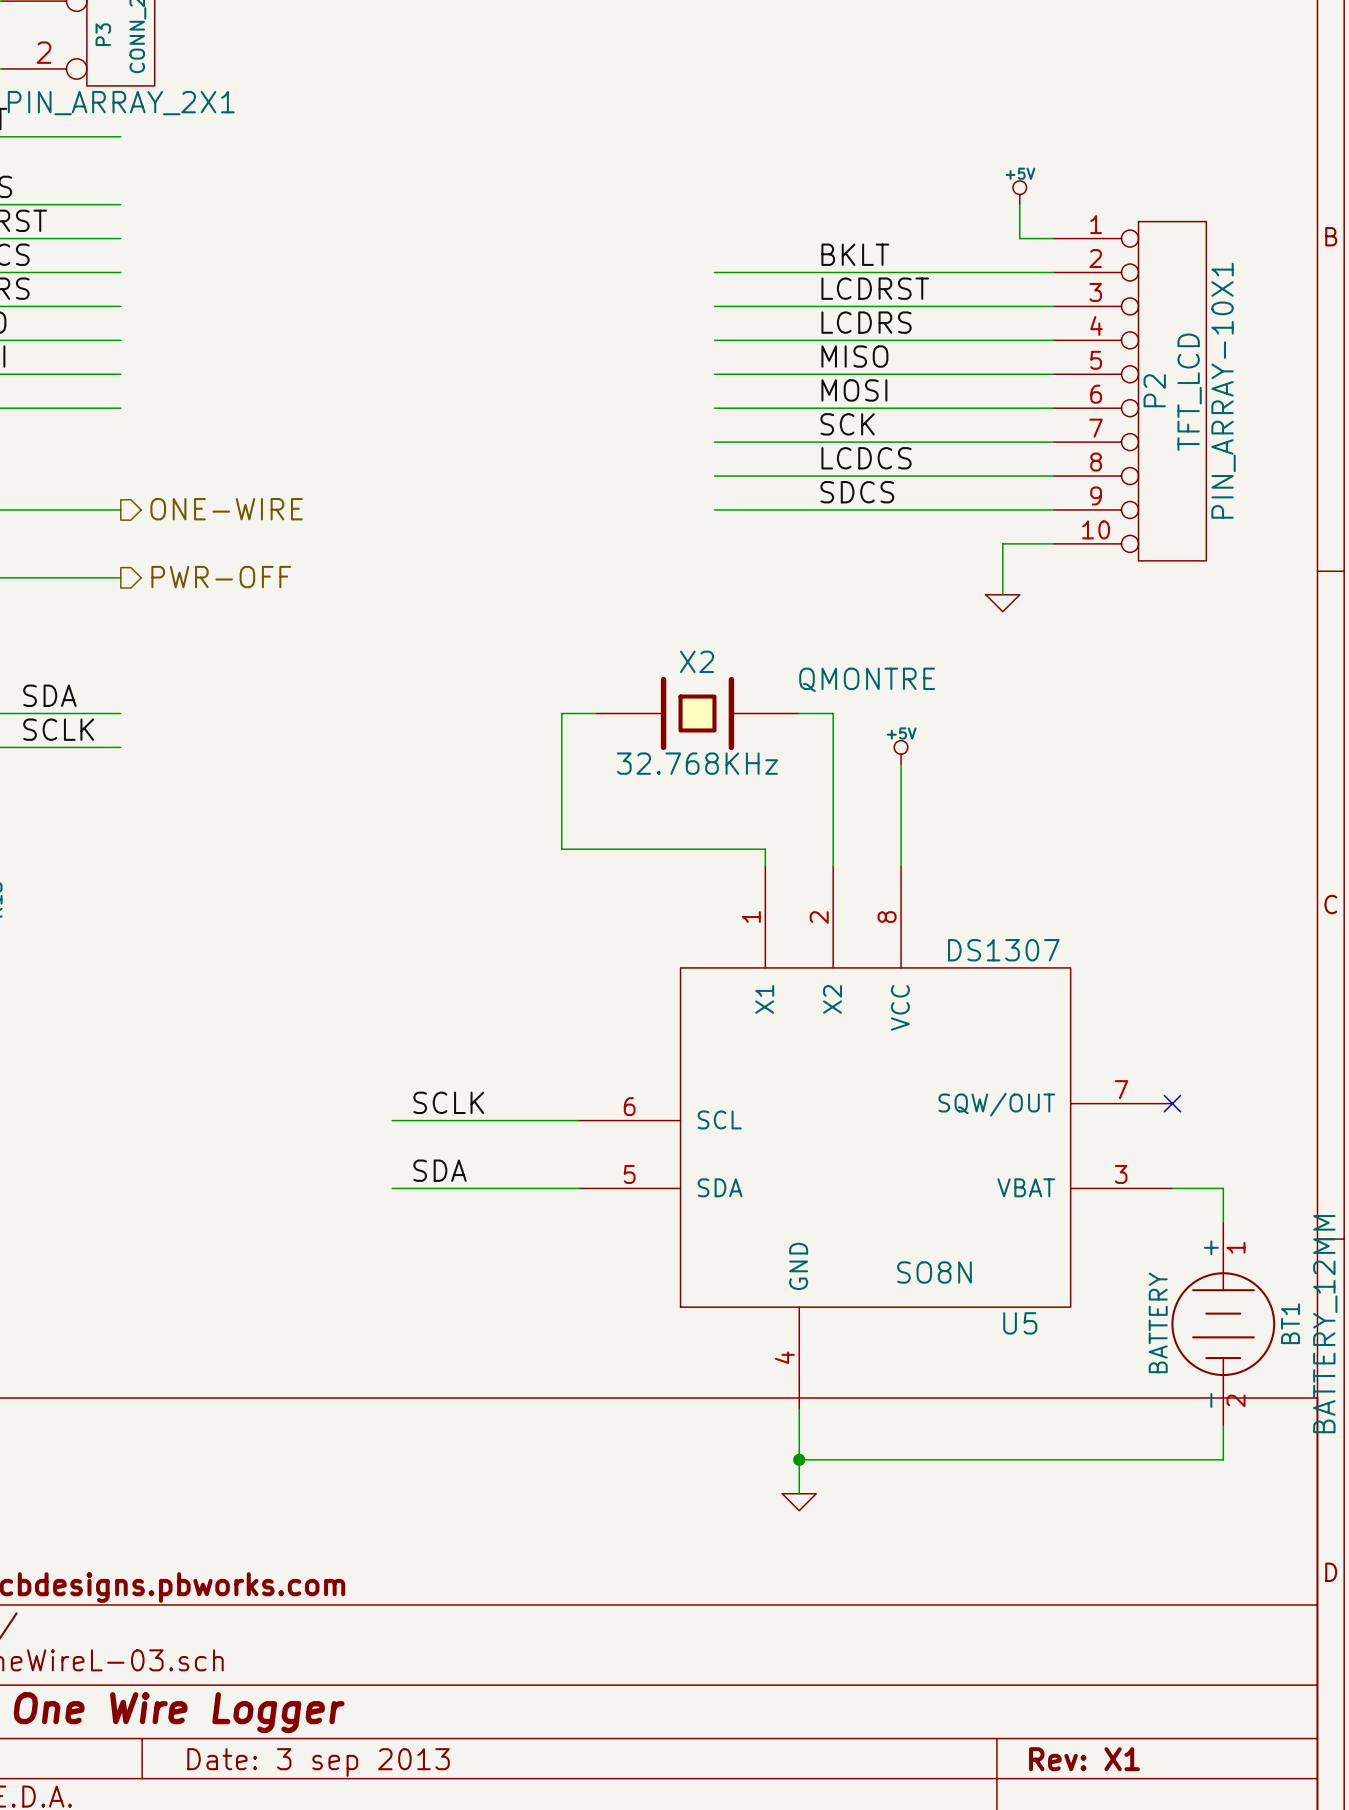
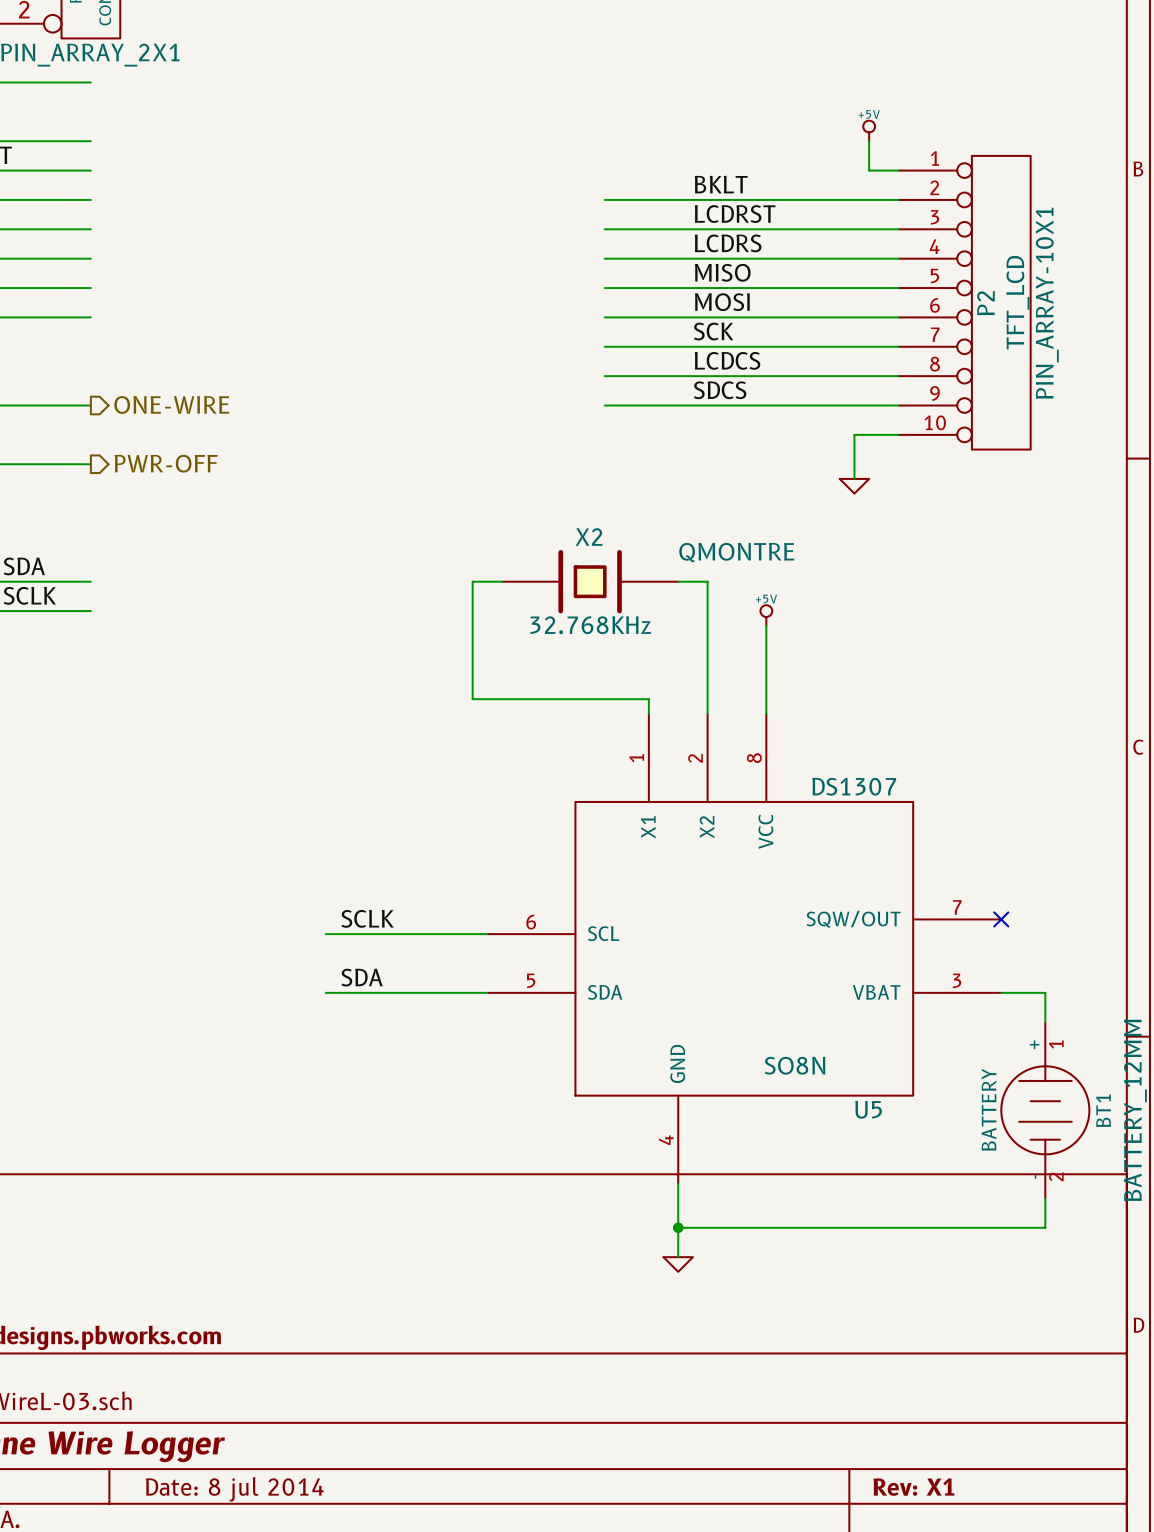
title block: Date: 3 sep 2013 (318, 1762) -> Date: 8 jul 2014 (234, 1489)

